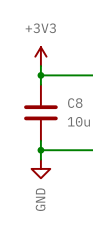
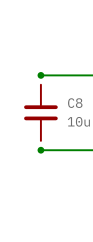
power symbol: +3V3 (40, 56) -> none
wire: (40, 66) (40, 84) -> none
wire: (40, 140) (40, 159) -> none
power symbol: GND (40, 168) -> none

